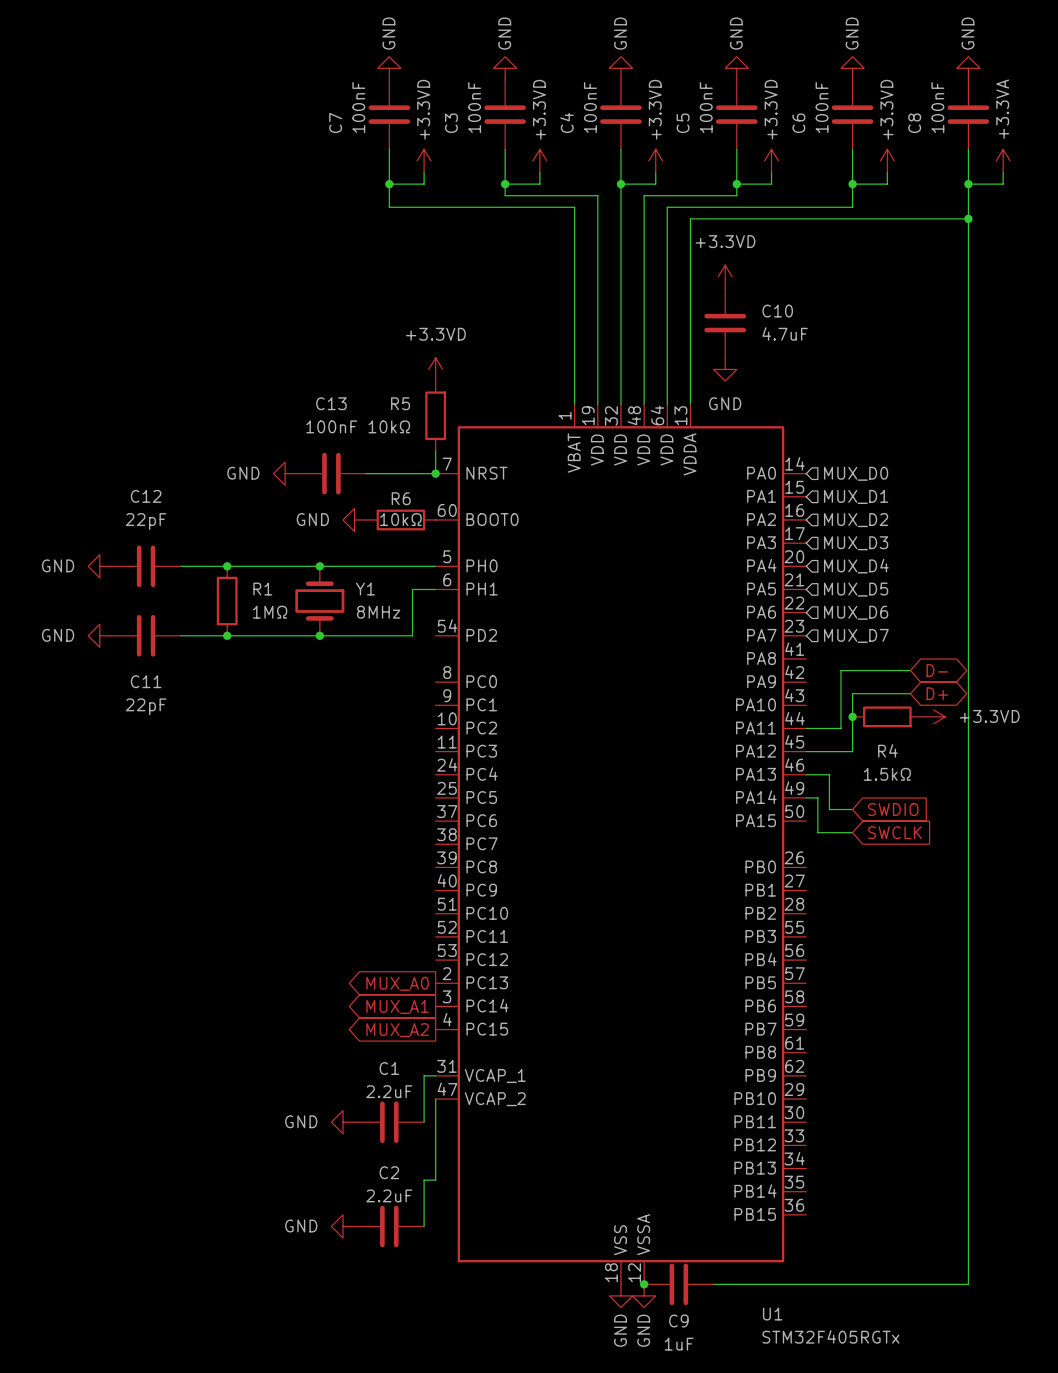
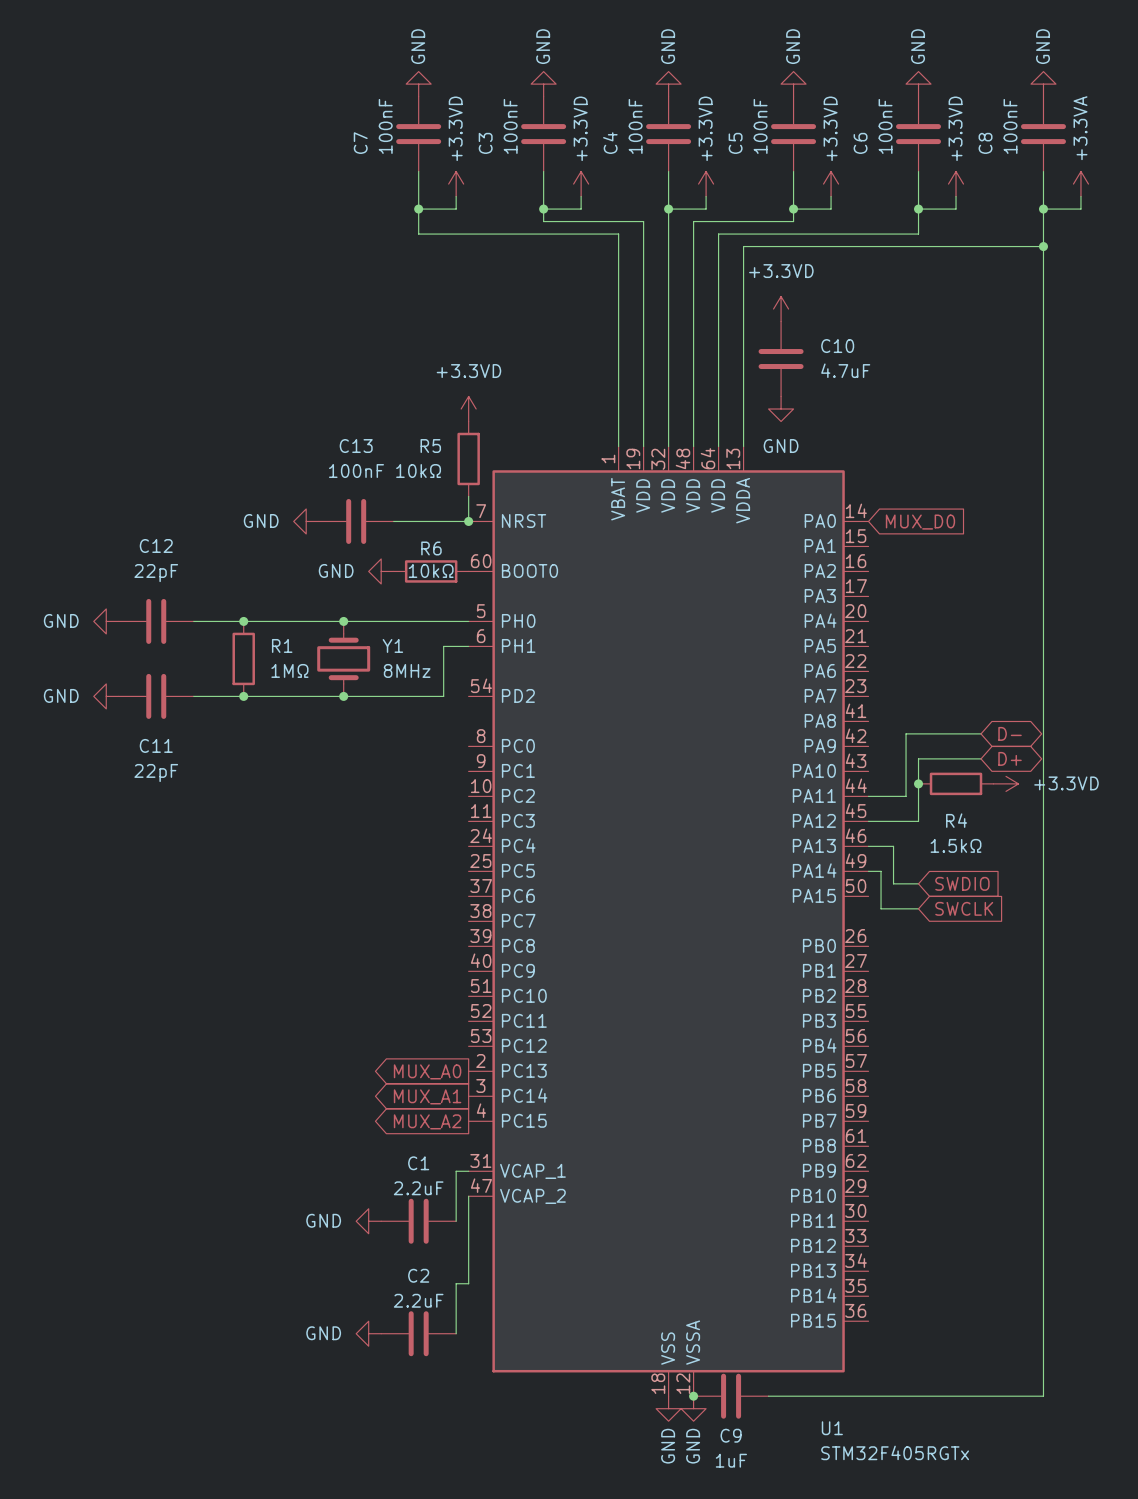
hierarchical label: MUX_D0 (856, 473) -> none
global label: none -> MUX_D0 (920, 522)
hierarchical label: MUX_D1 (856, 496) -> none
hierarchical label: MUX_D2 (856, 520) -> none
hierarchical label: MUX_D3 (856, 543) -> none
hierarchical label: MUX_D4 (856, 566) -> none
hierarchical label: MUX_D5 (856, 589) -> none
hierarchical label: MUX_D6 (856, 612) -> none
hierarchical label: MUX_D7 (856, 635) -> none

